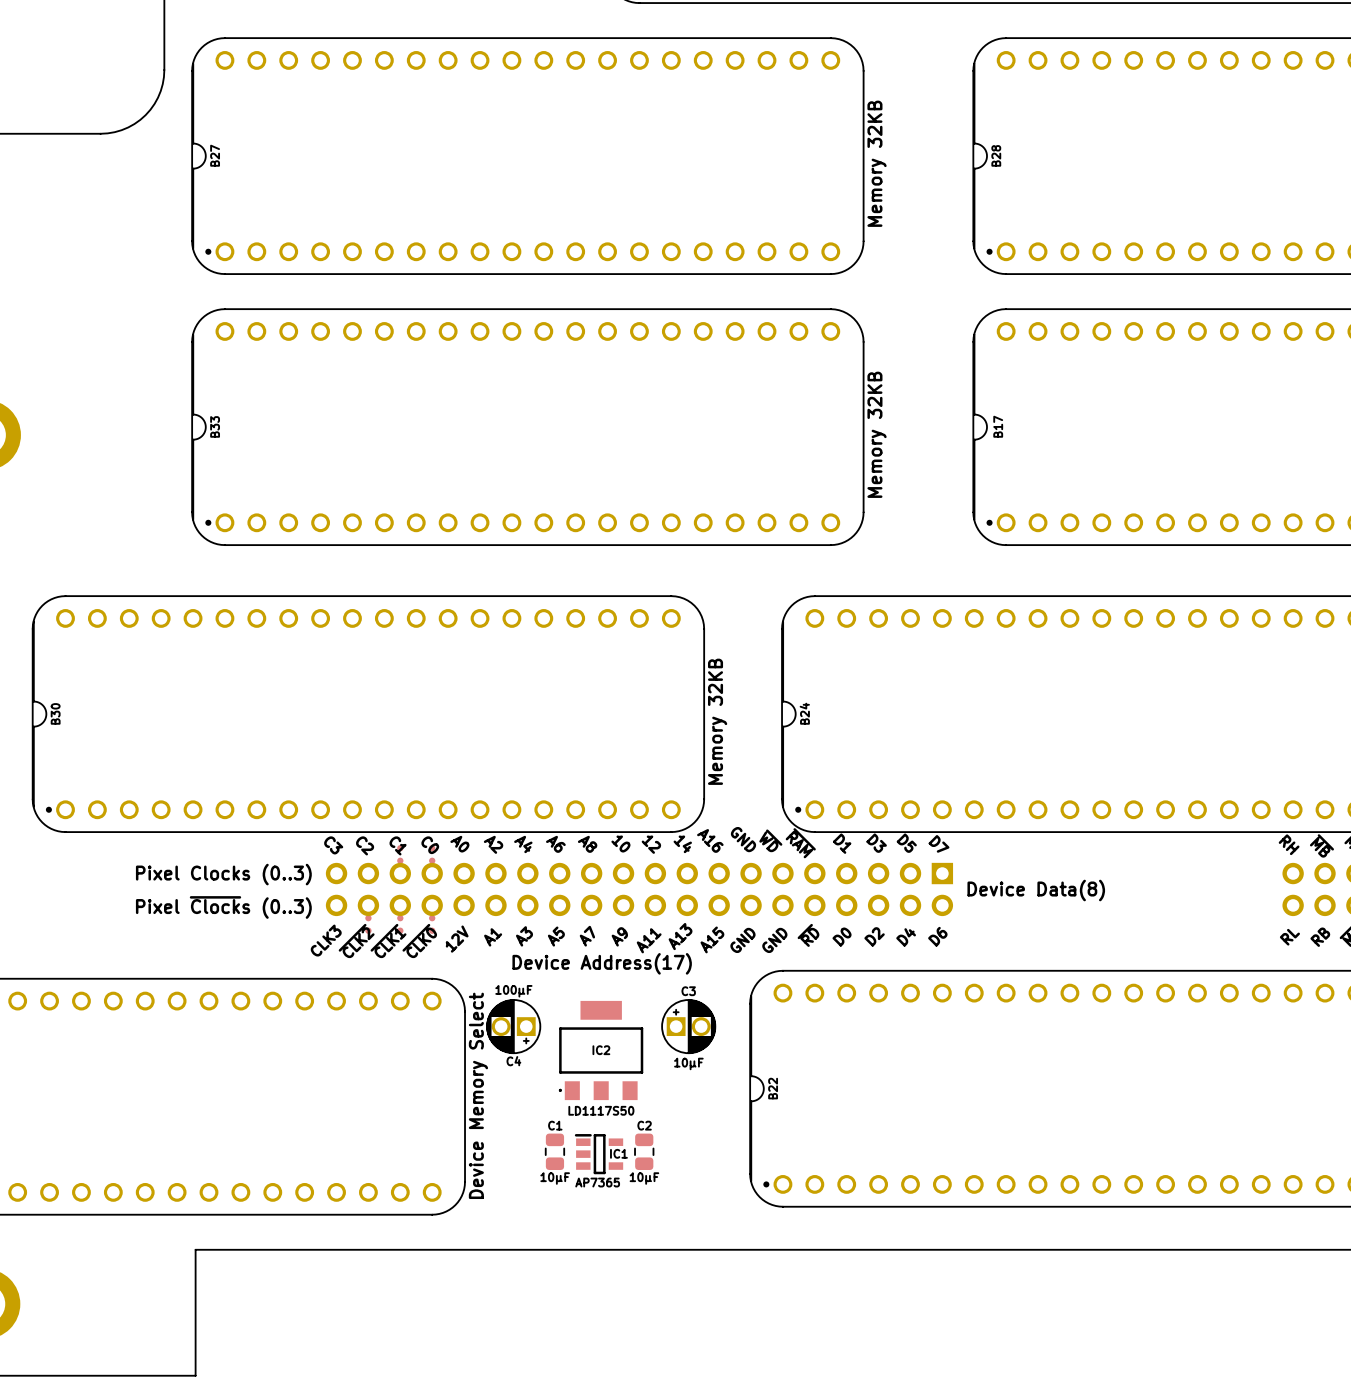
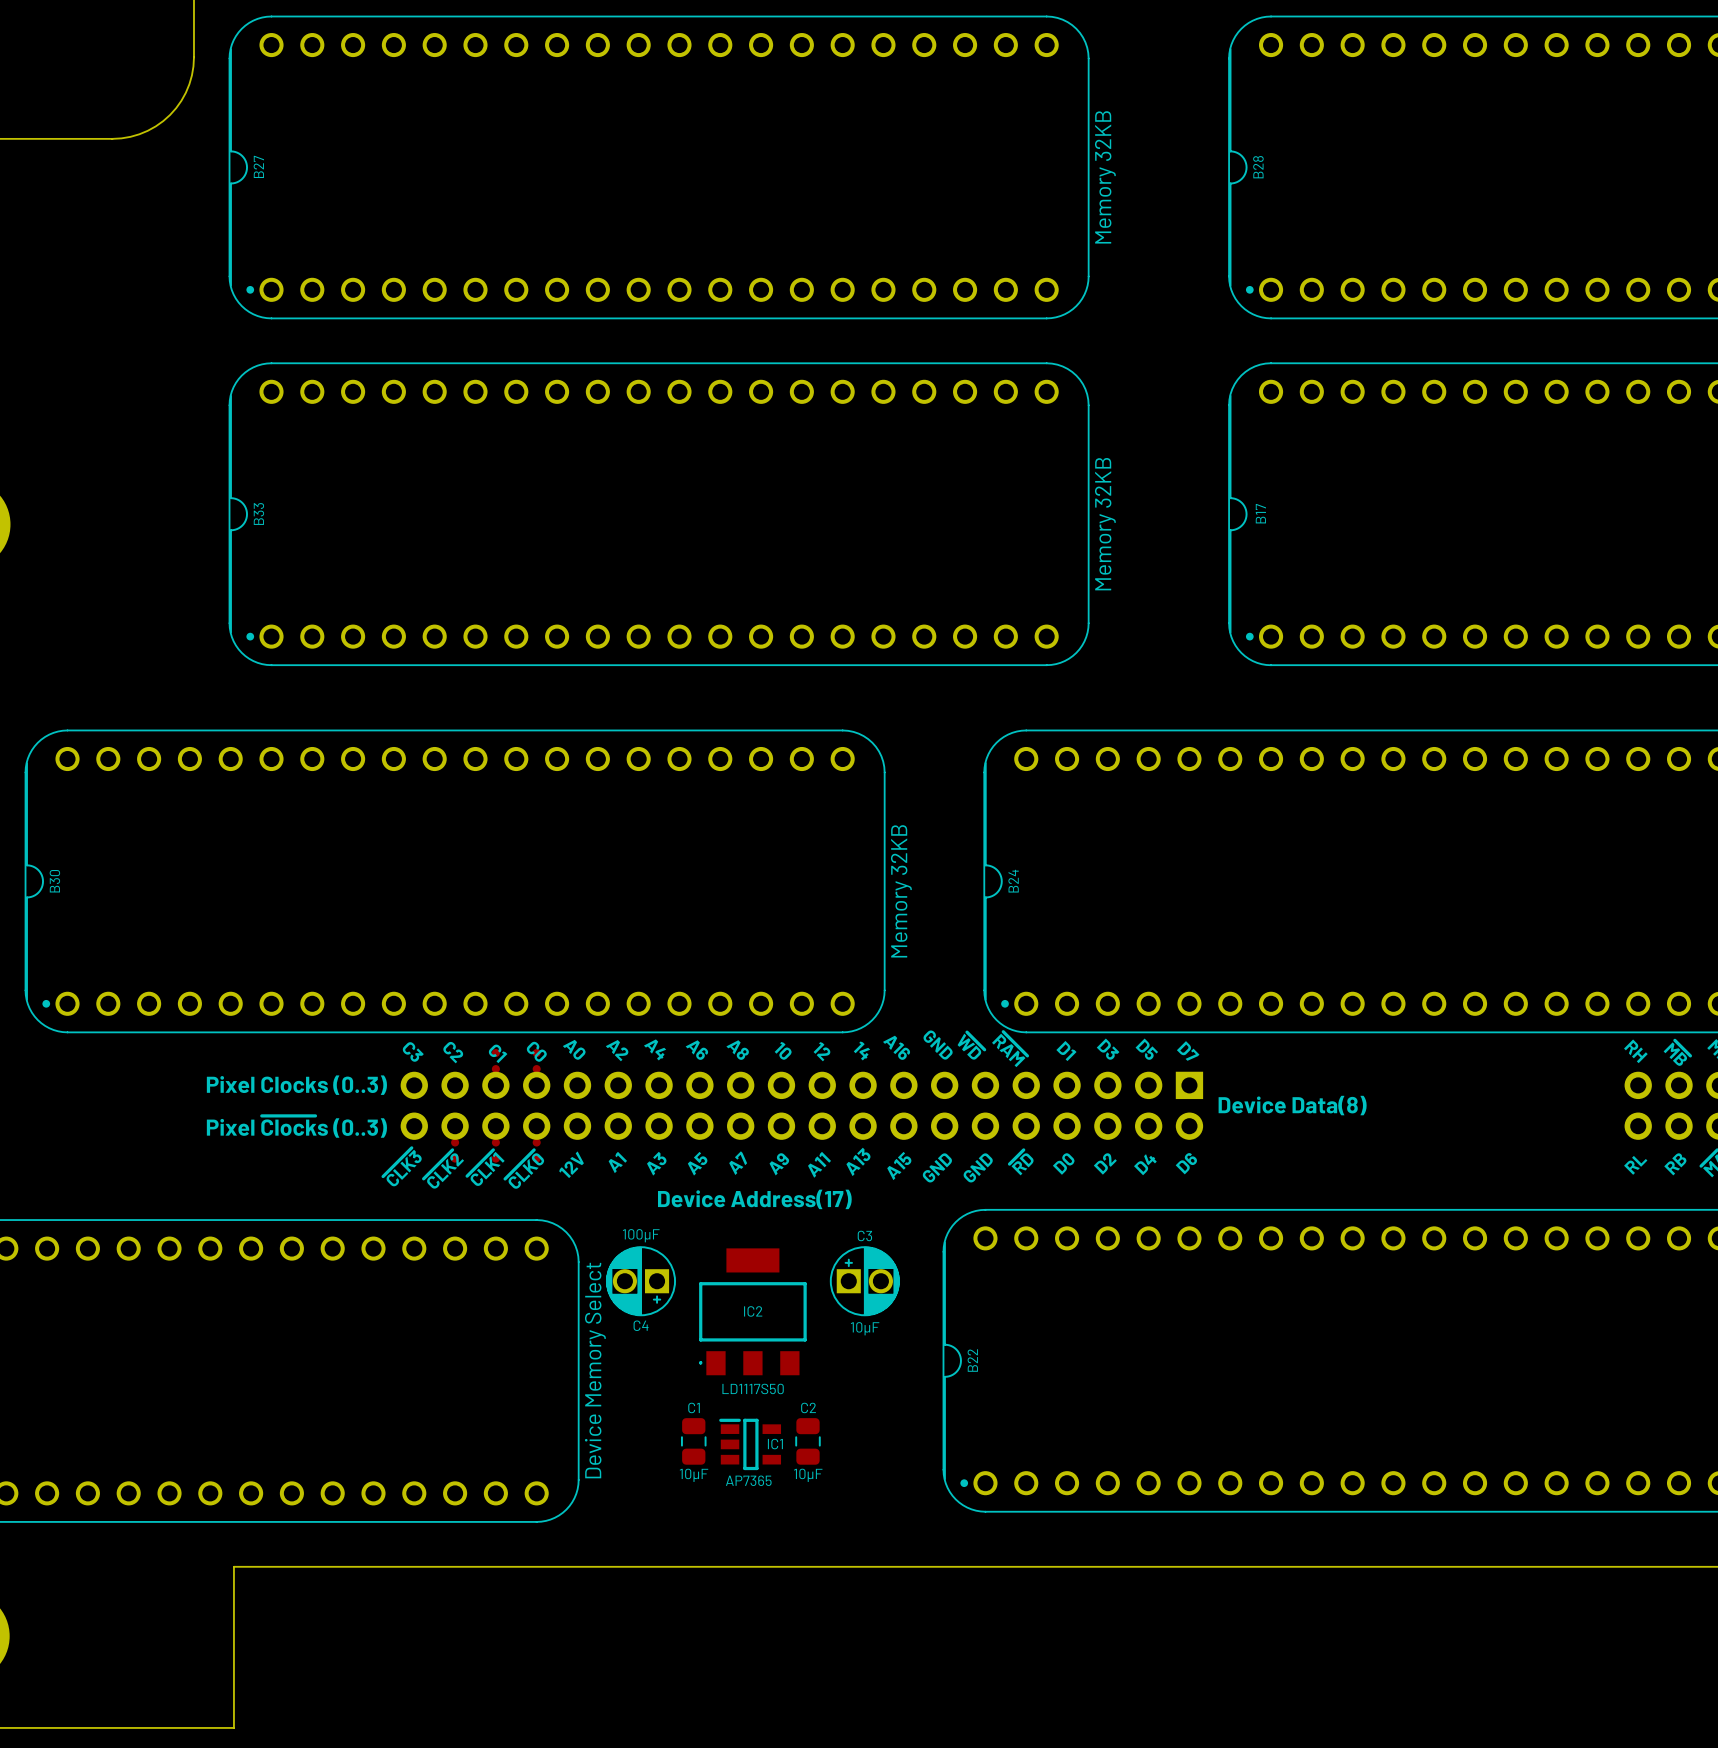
text: CLK3 (326, 940) -> ~{CLK3} (402, 1167)

